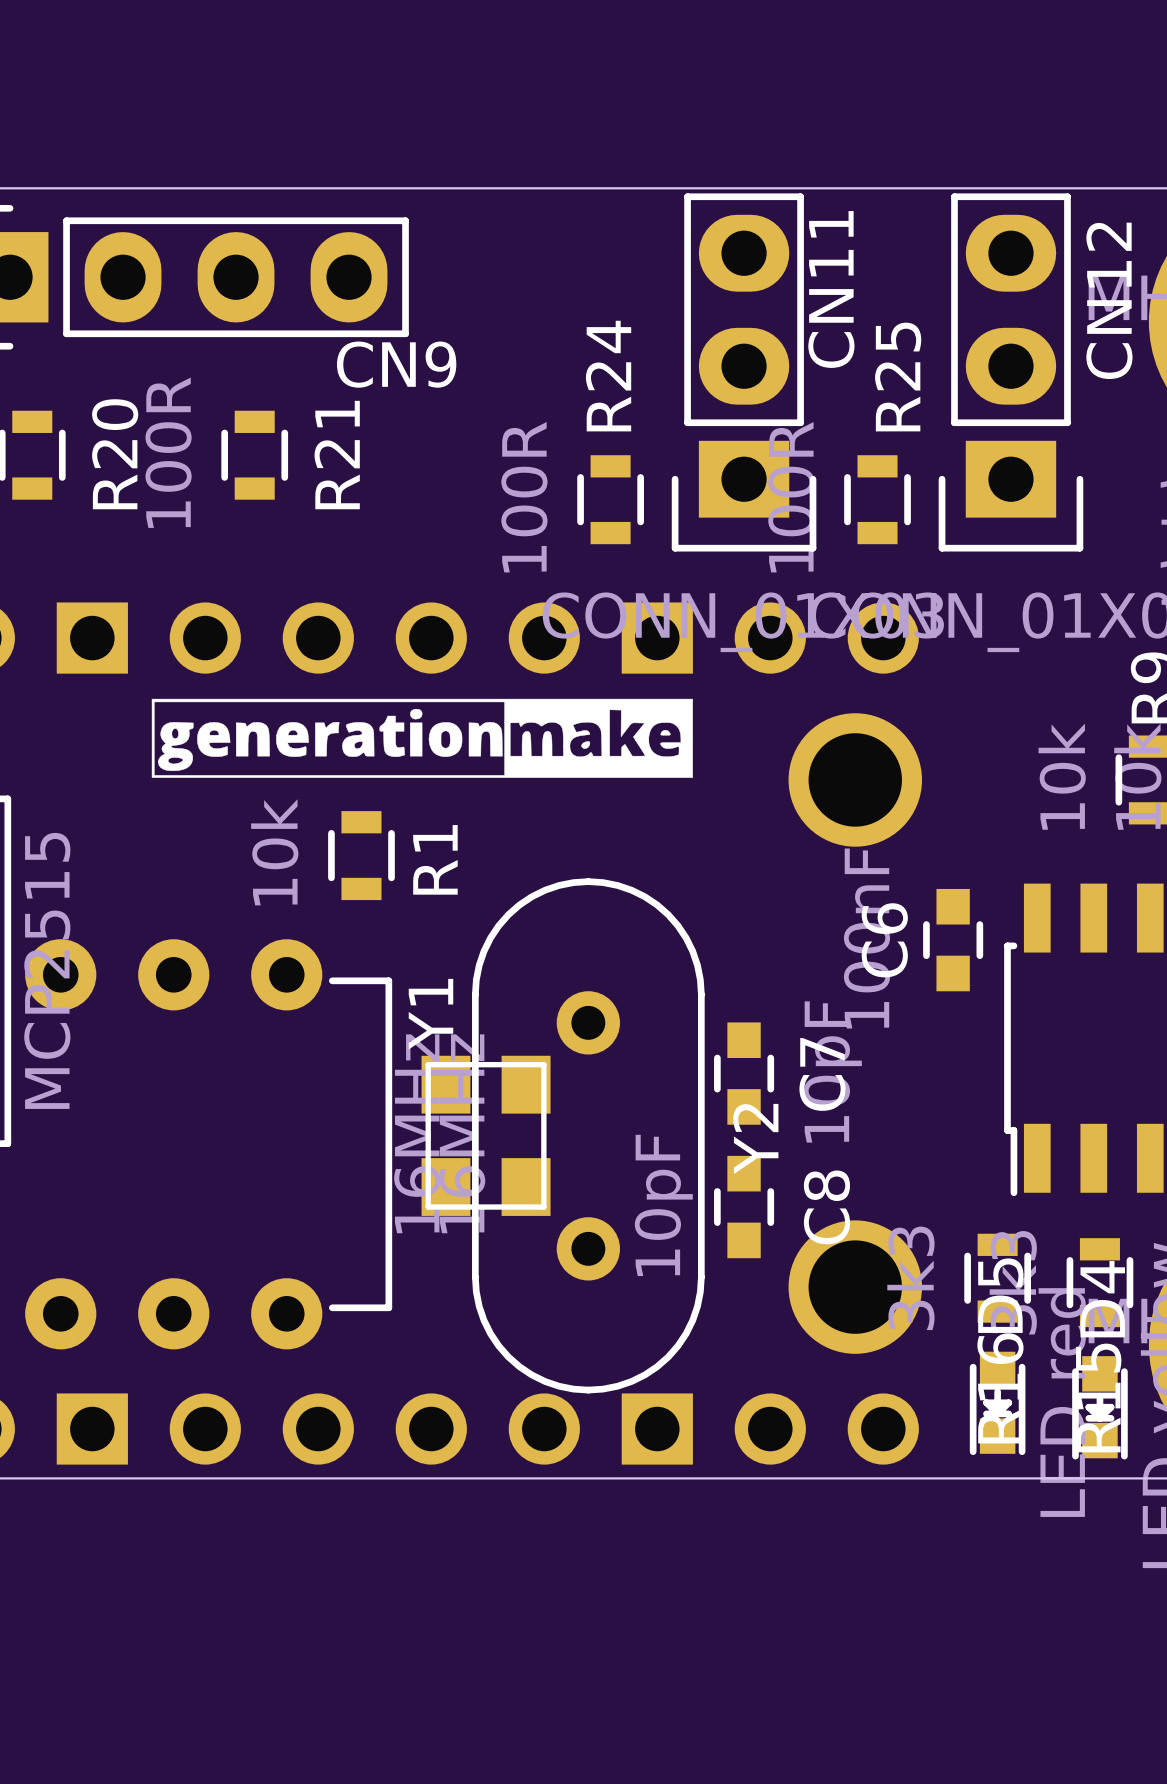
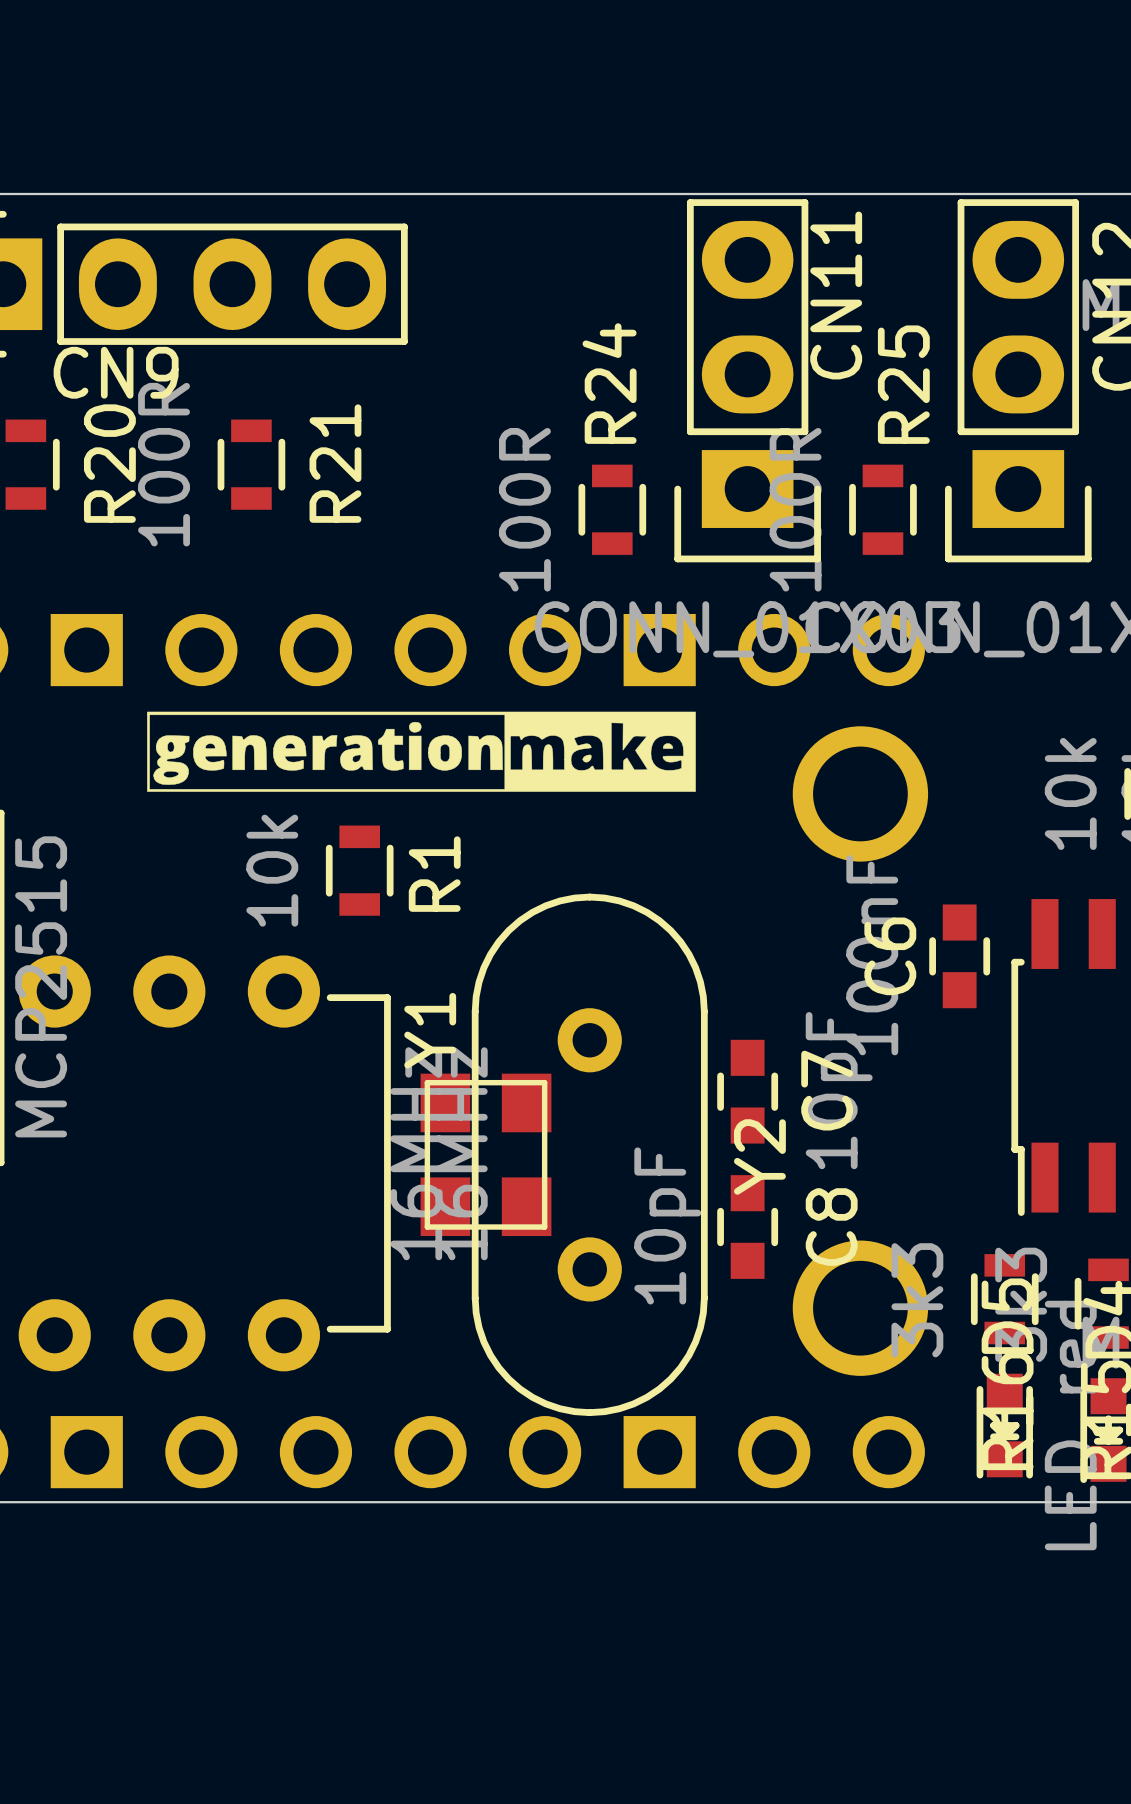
CN9 name position: CN9 (396, 364) -> CN9 (116, 372)

